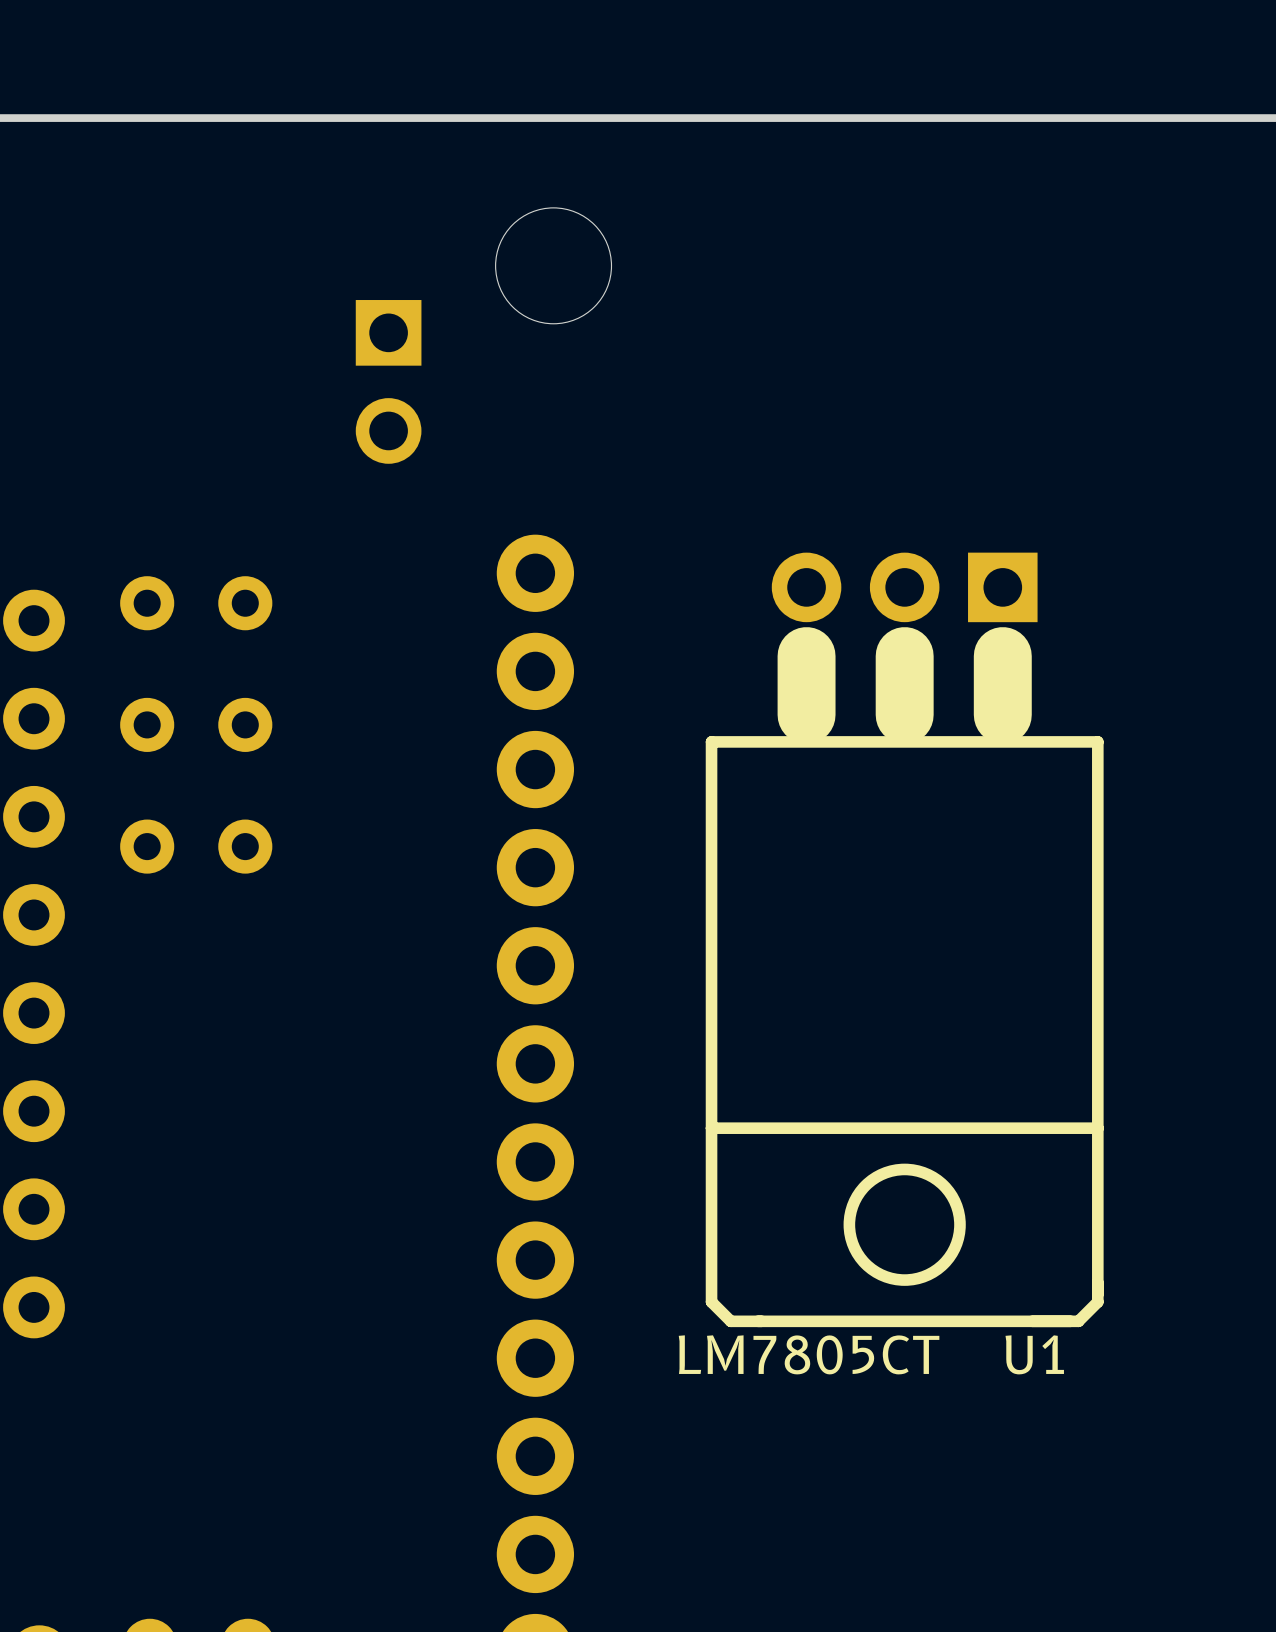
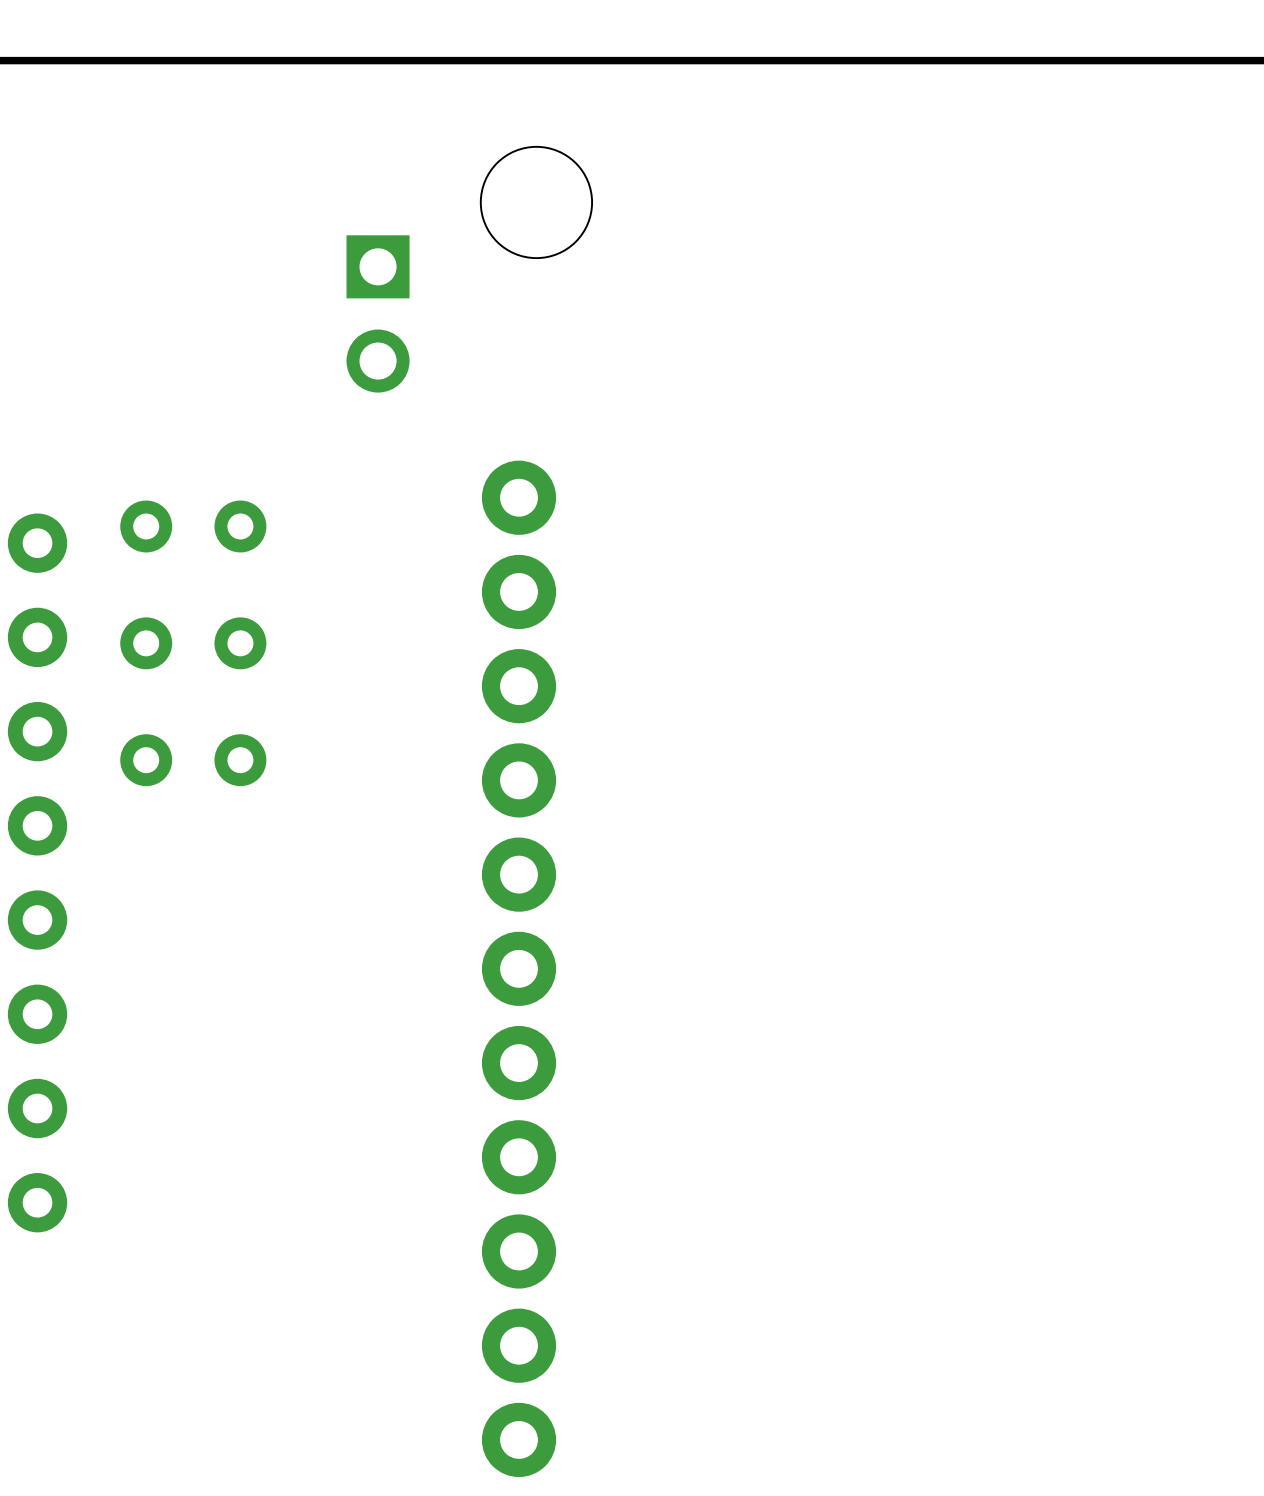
U1: LM7805CT (904, 939) -> none

